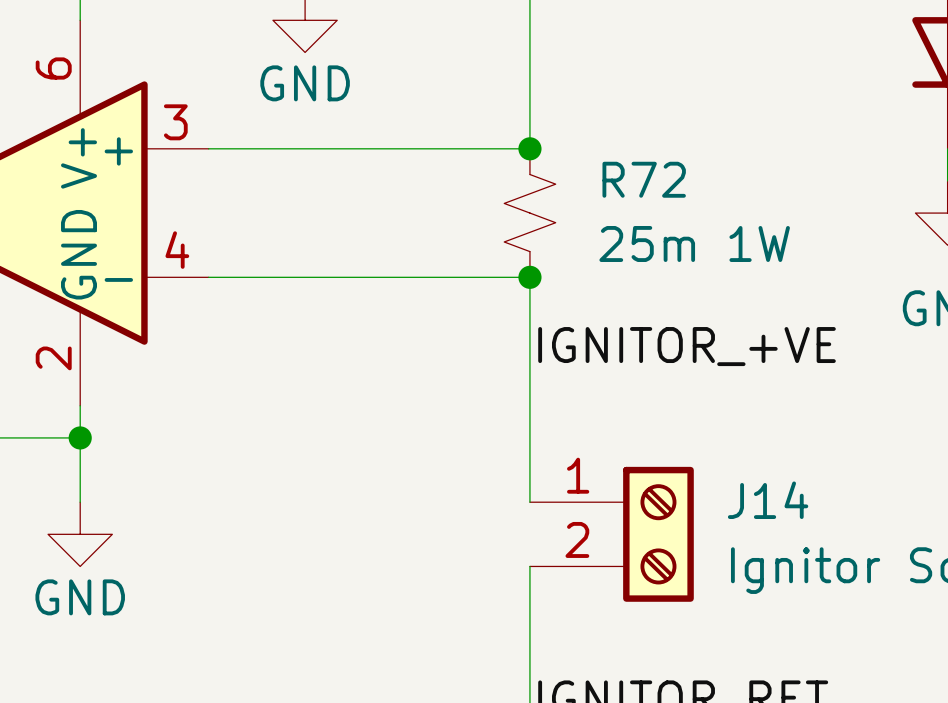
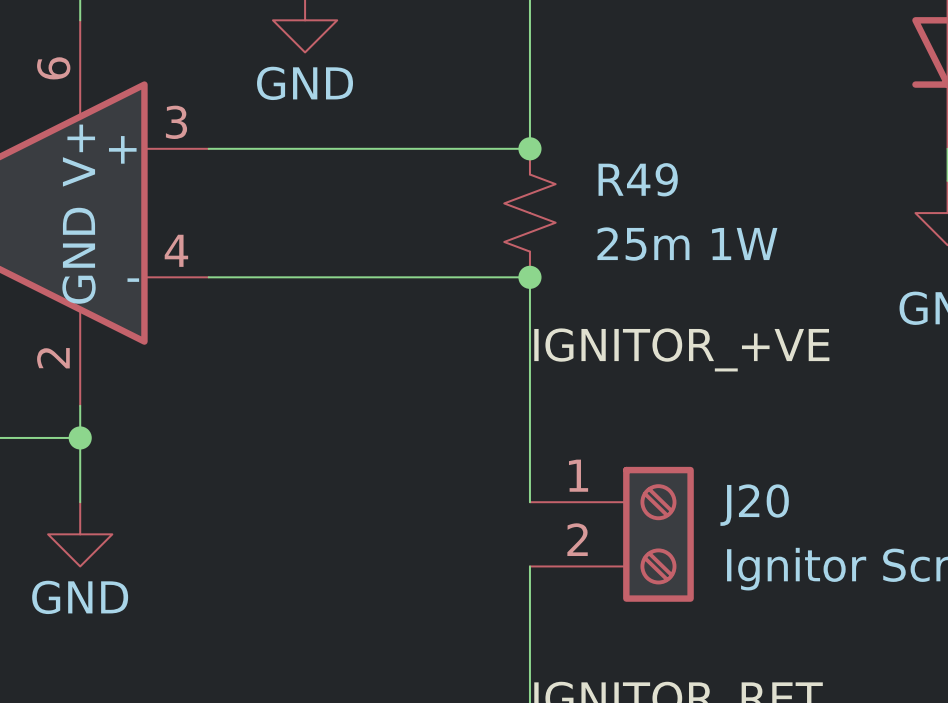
R72 name: R72 (644, 179) -> R49 (638, 179)
J14 name: J14 (768, 500) -> J20 (754, 505)

